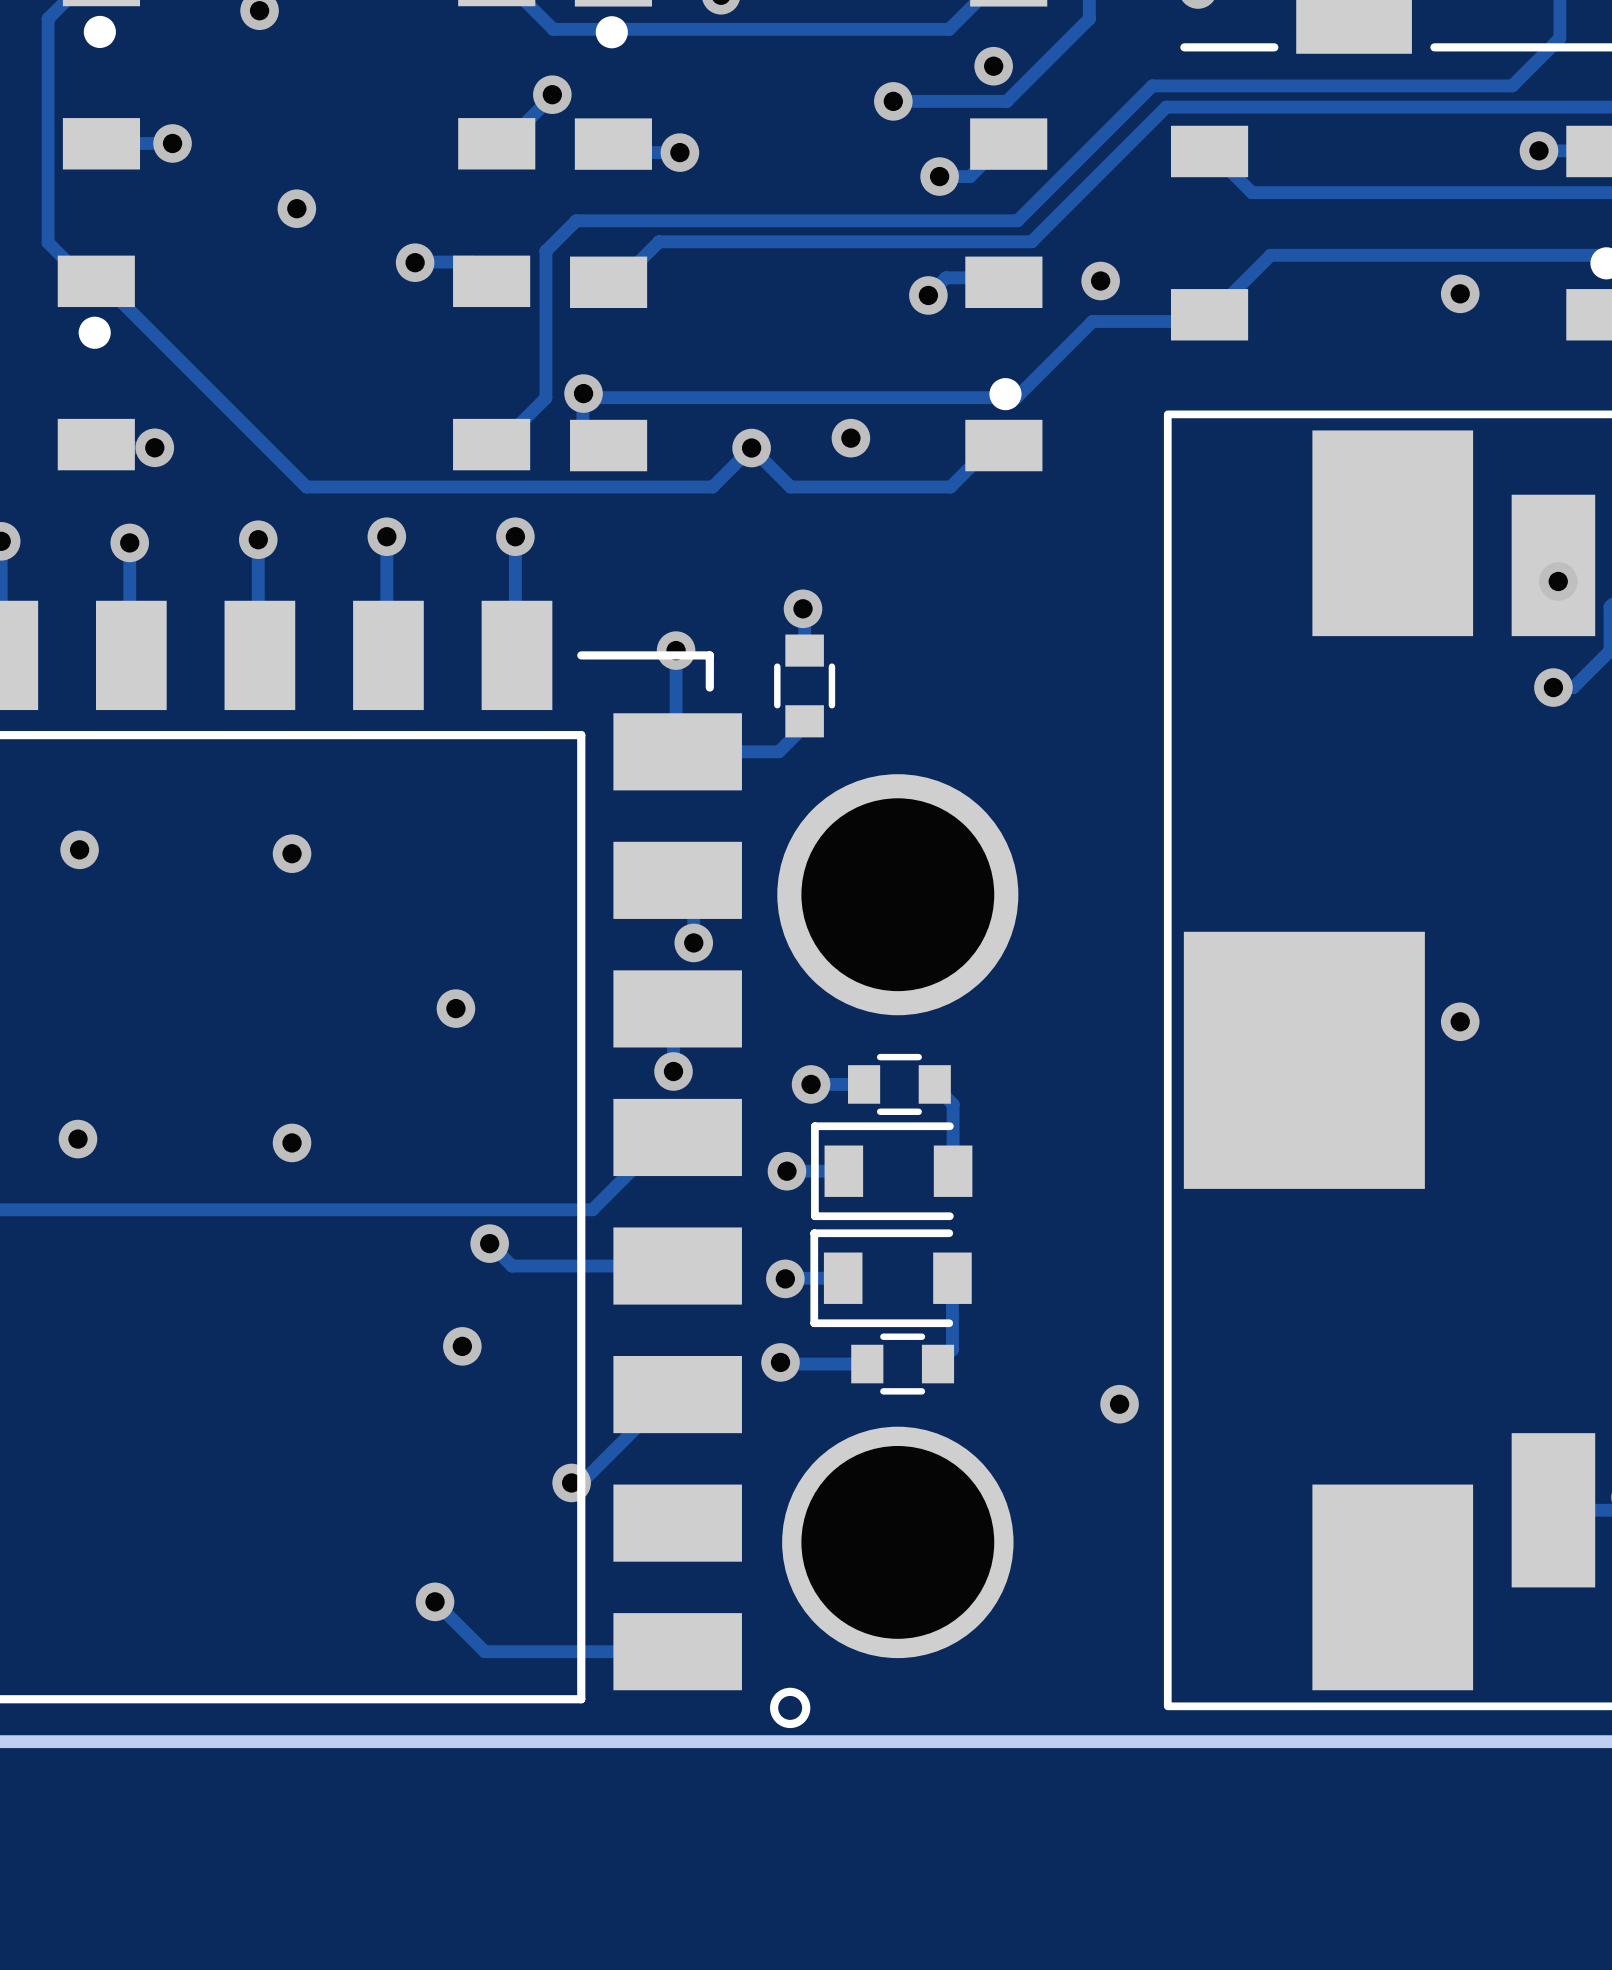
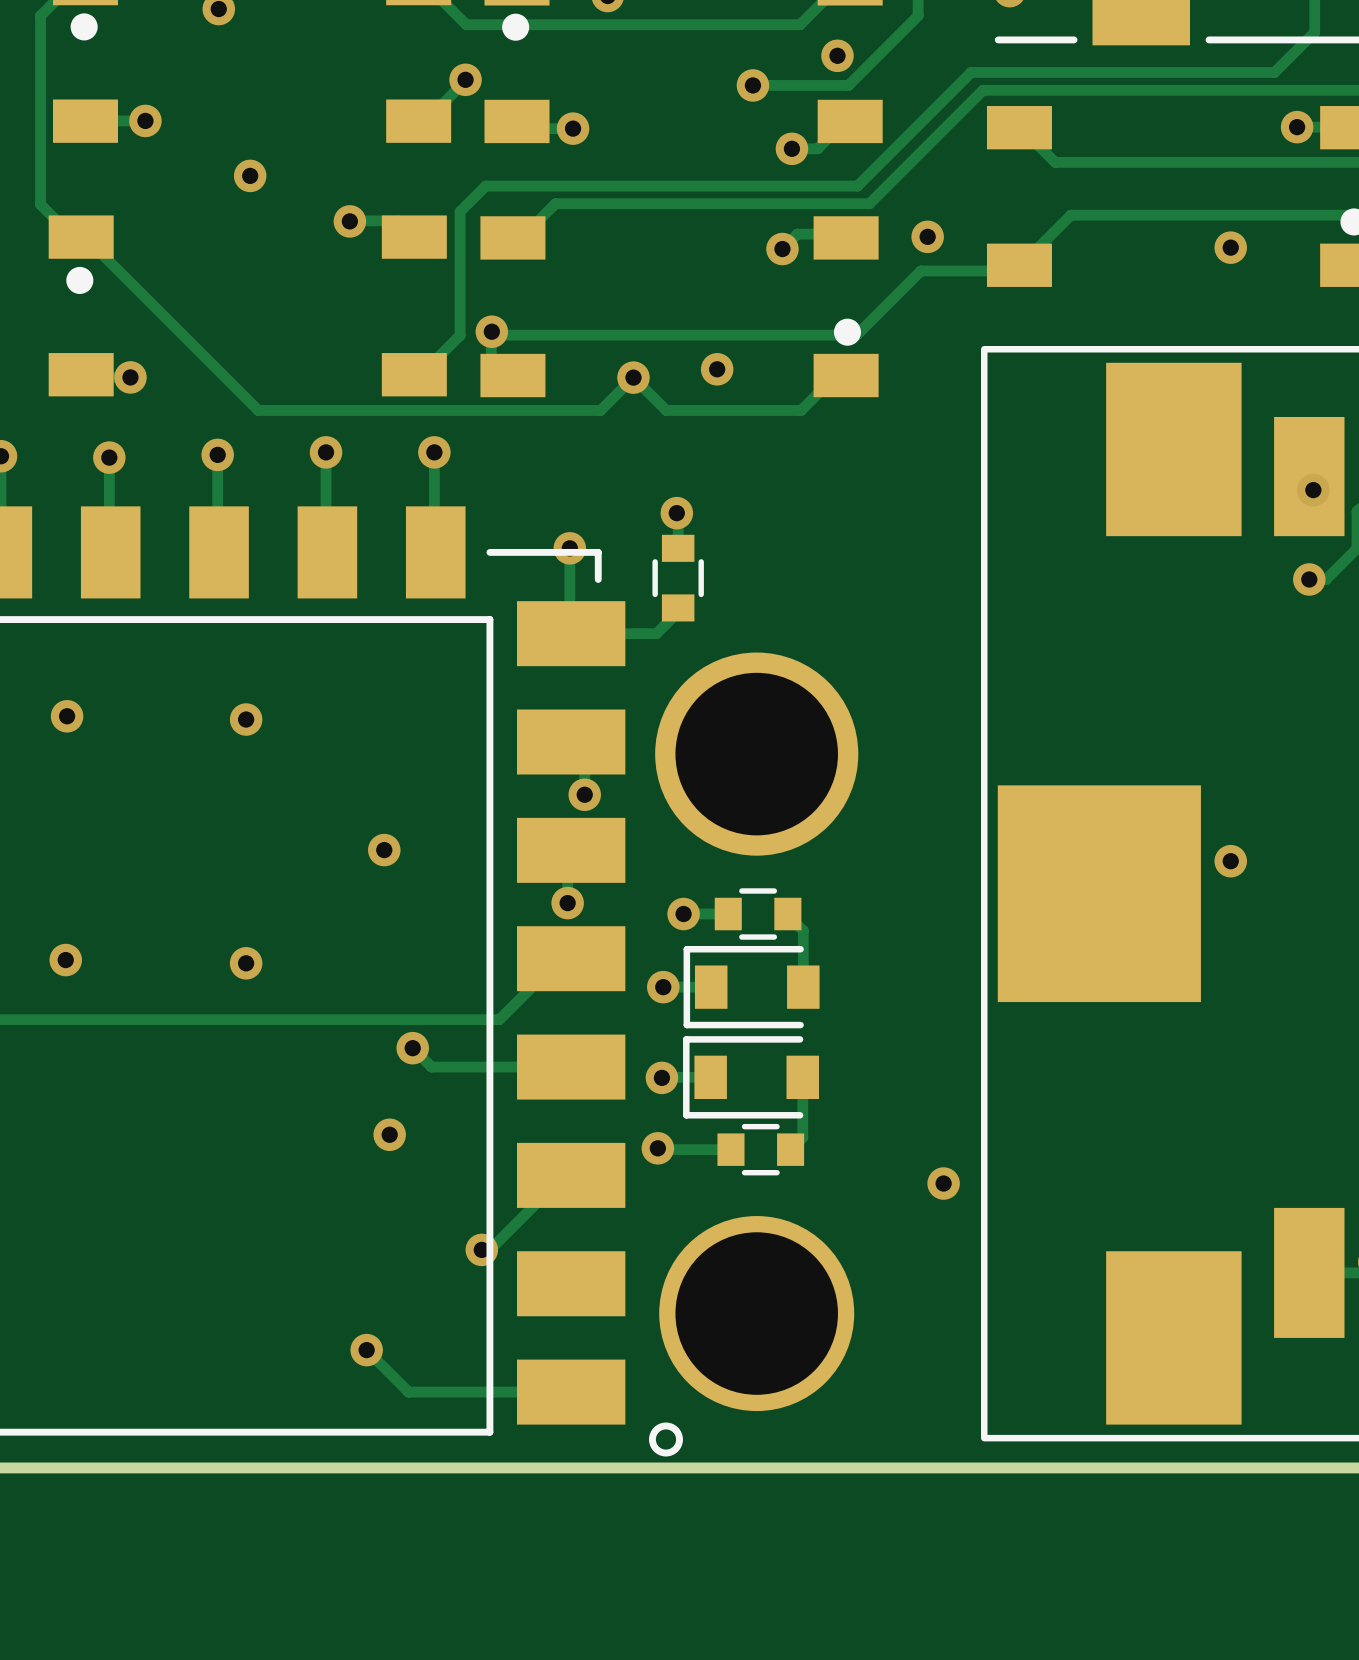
part position: (897, 1542) -> (756, 1313)

